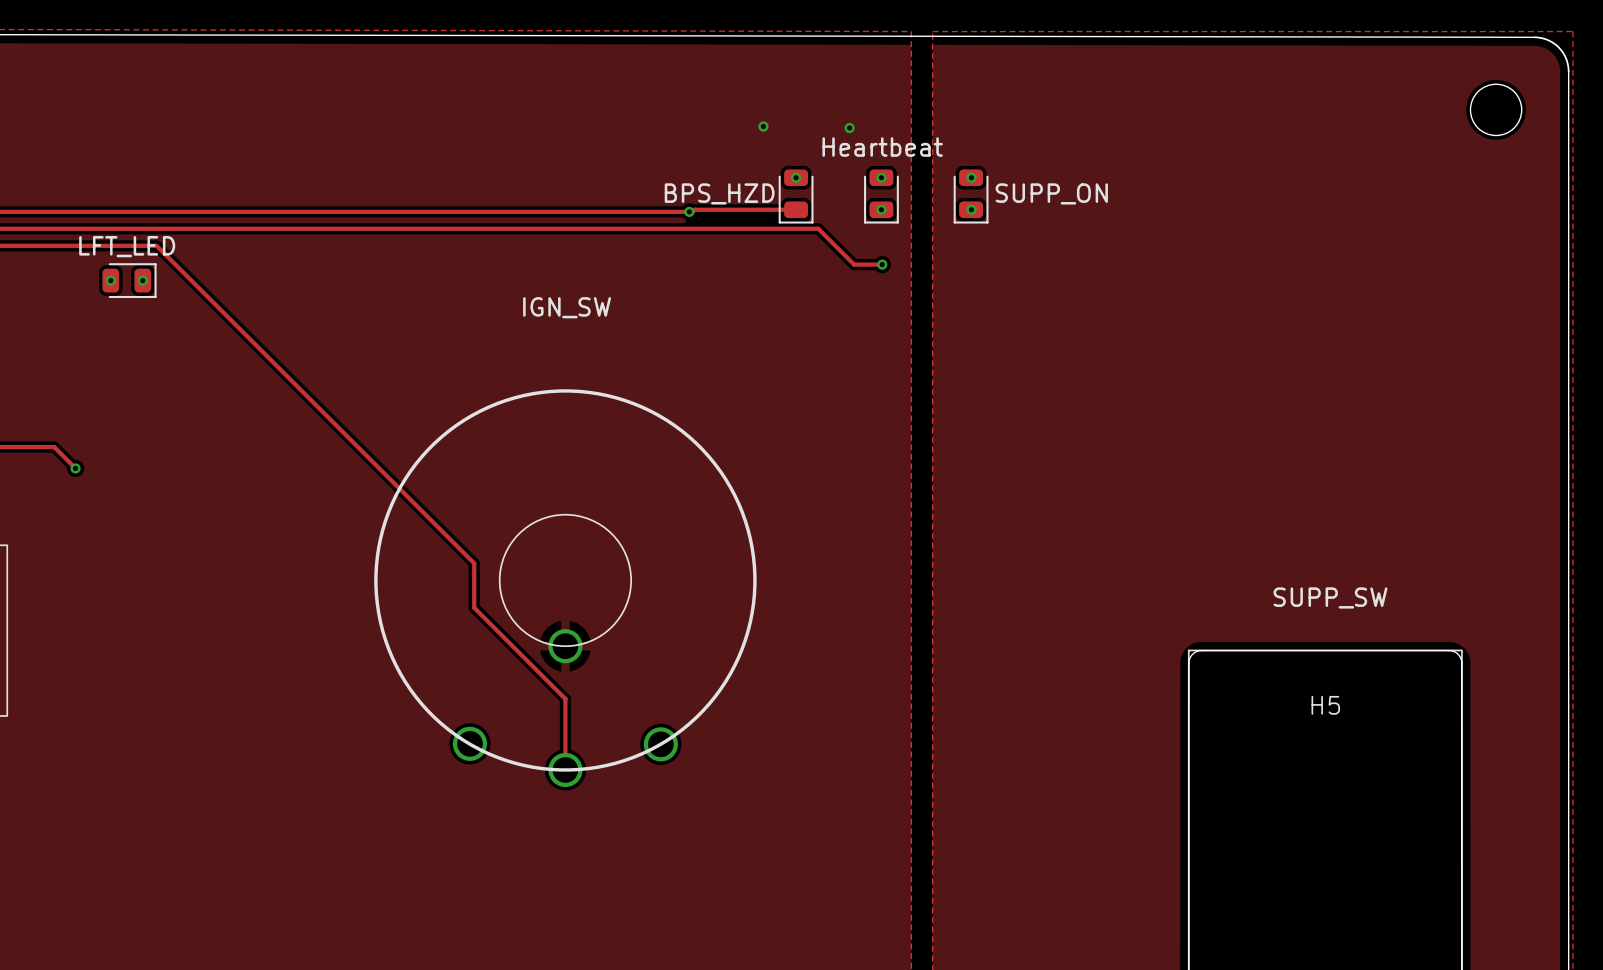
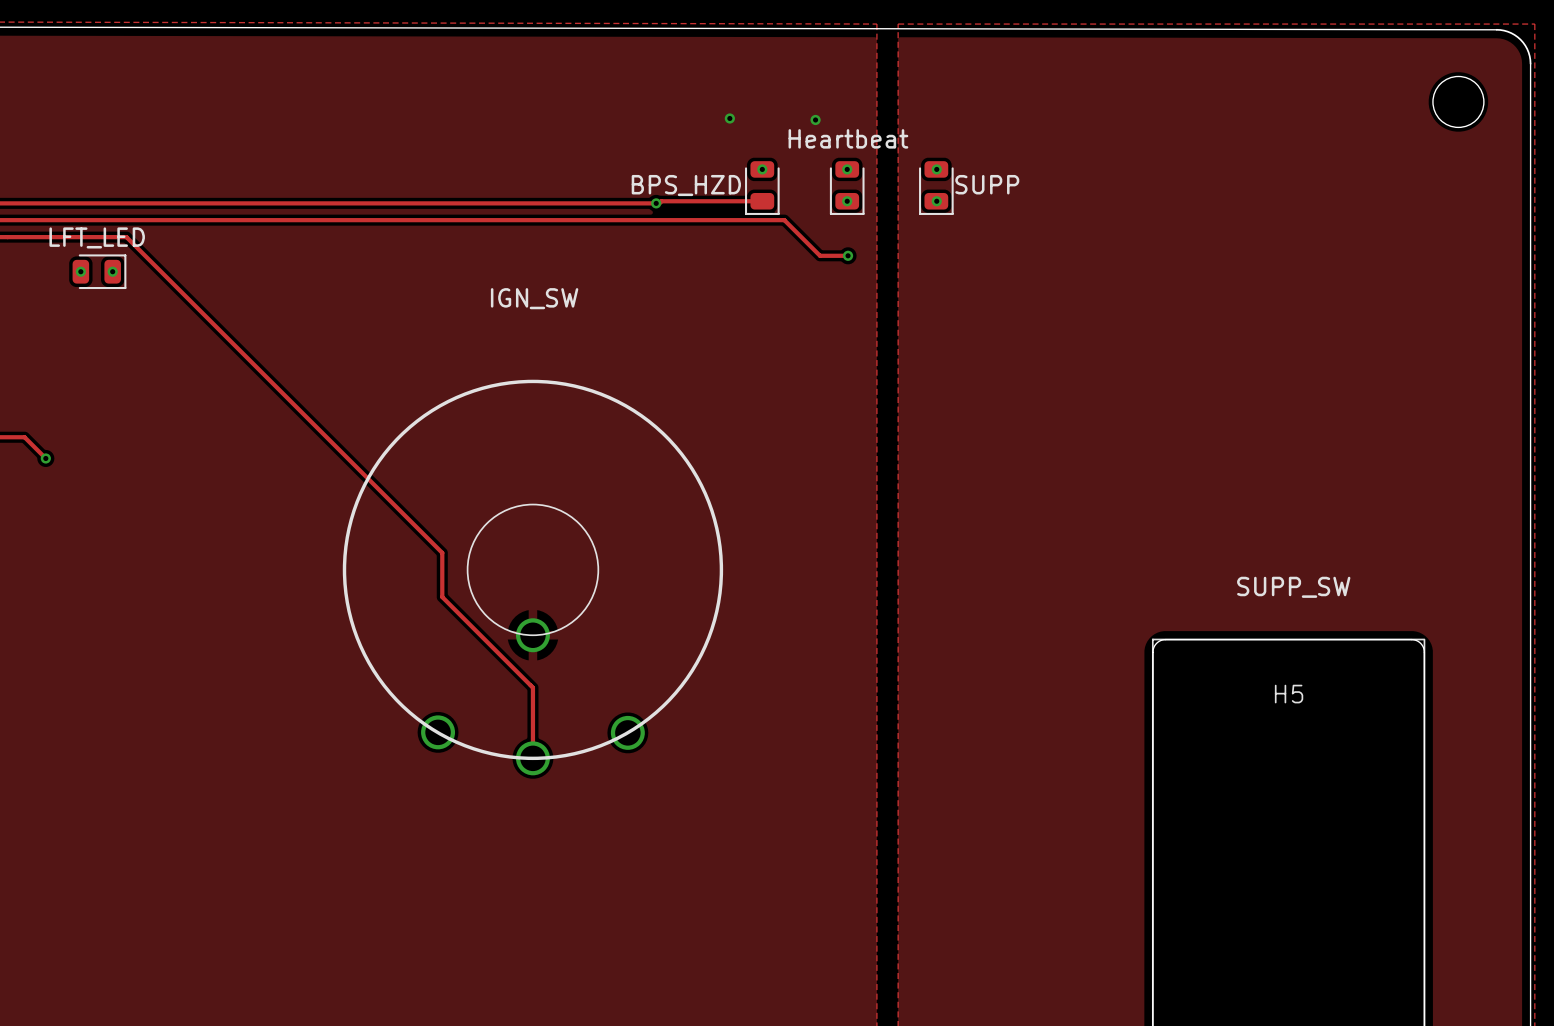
SUPP_ON name: SUPP_ON (1051, 193) -> SUPP (987, 184)

